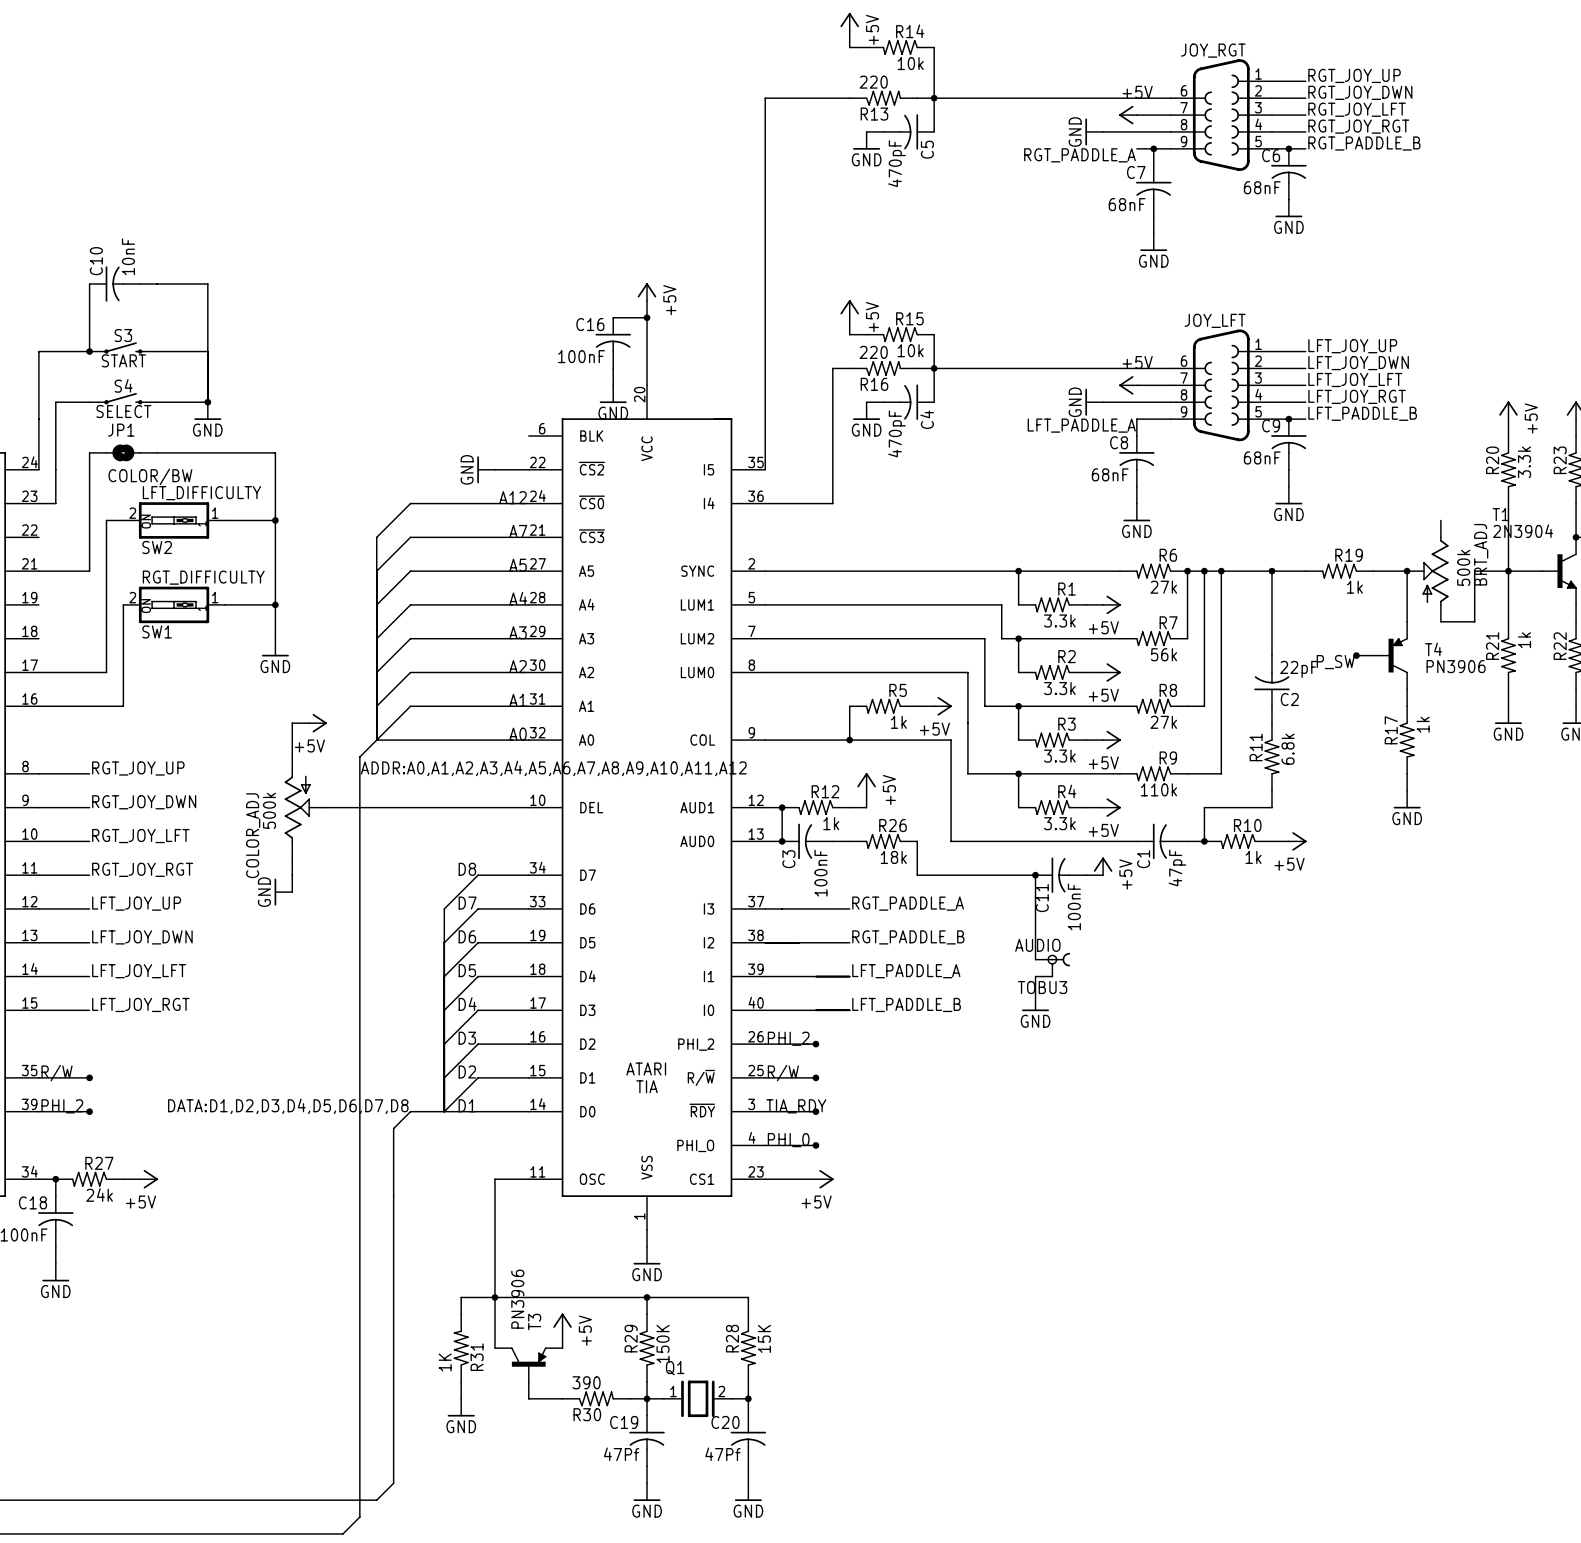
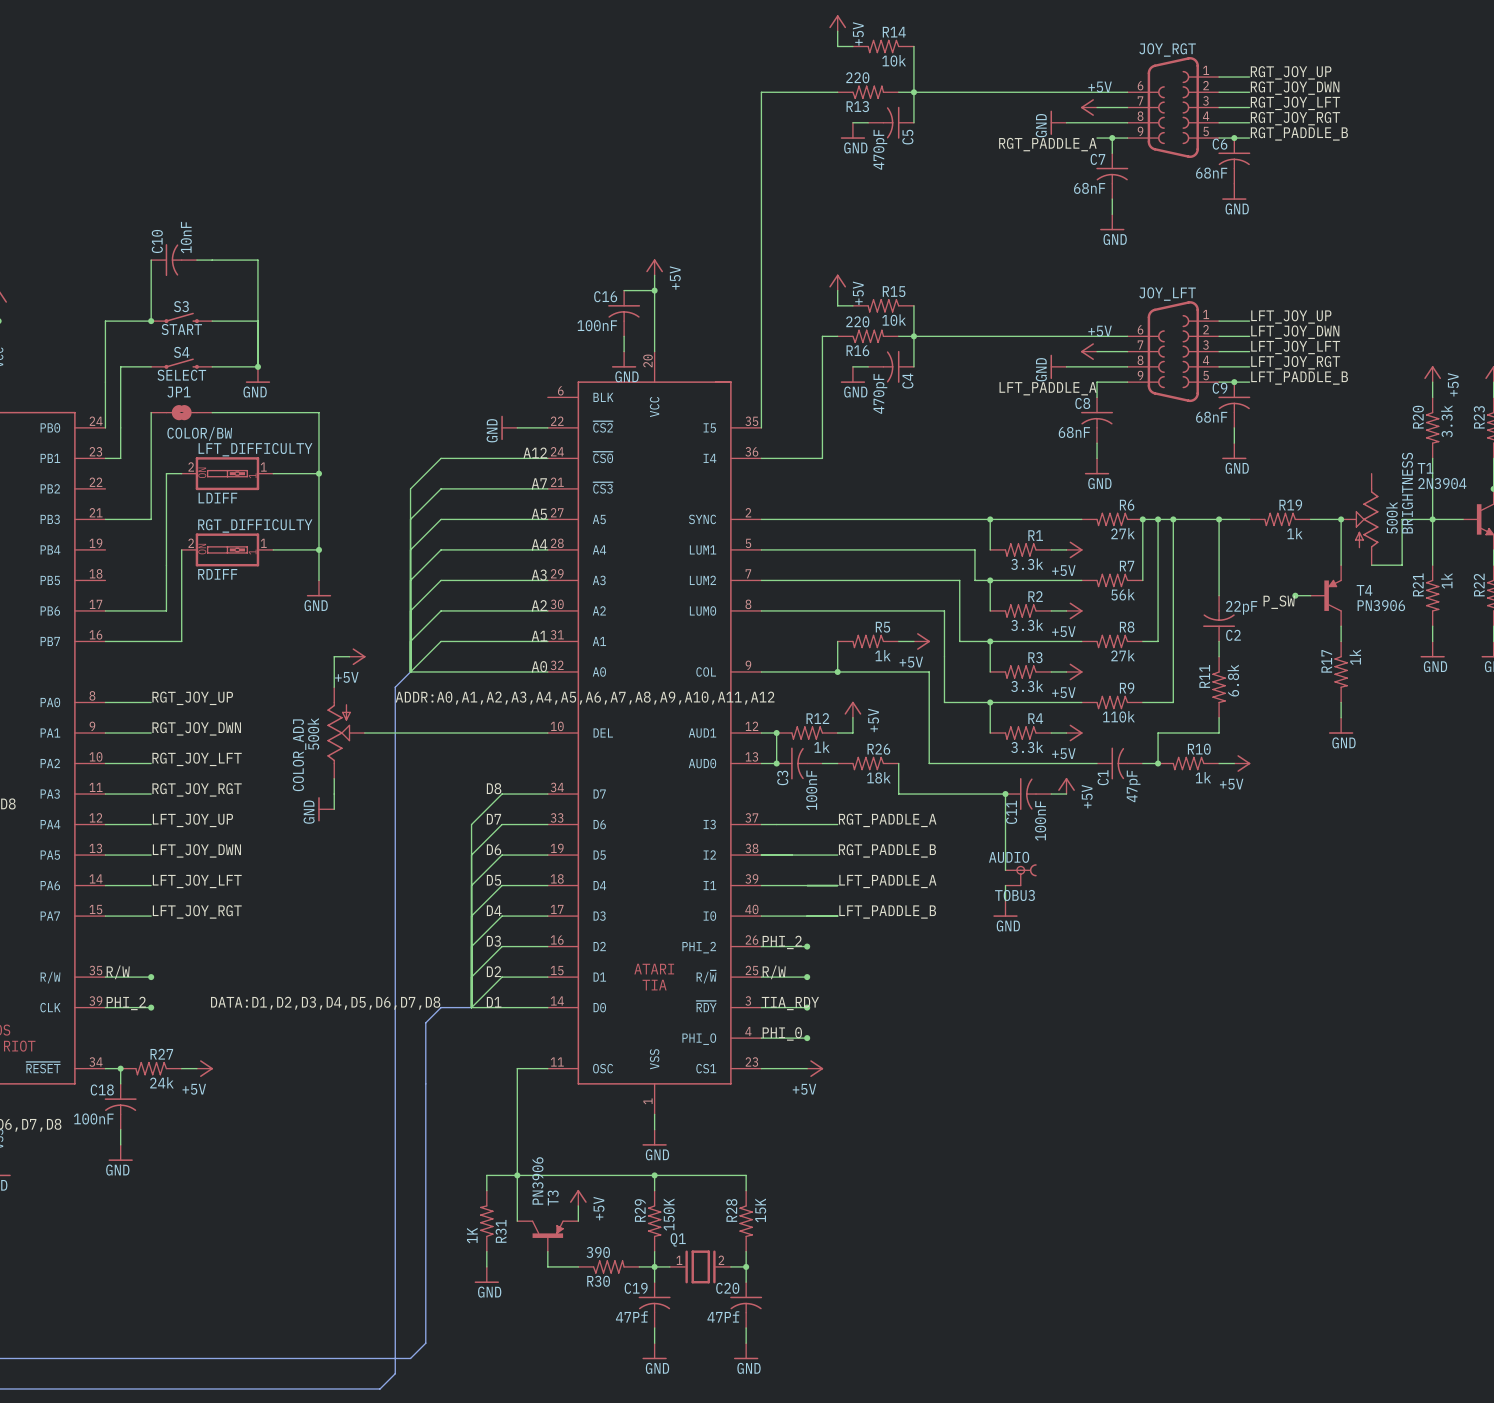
SW2 name: SW2 (157, 547) -> LDIFF (217, 498)
BRT_ADJ name: BRT_ADJ (1481, 554) -> BRIGHTNESS (1407, 493)
SW1 name: SW1 (157, 631) -> RDIFF (217, 574)

